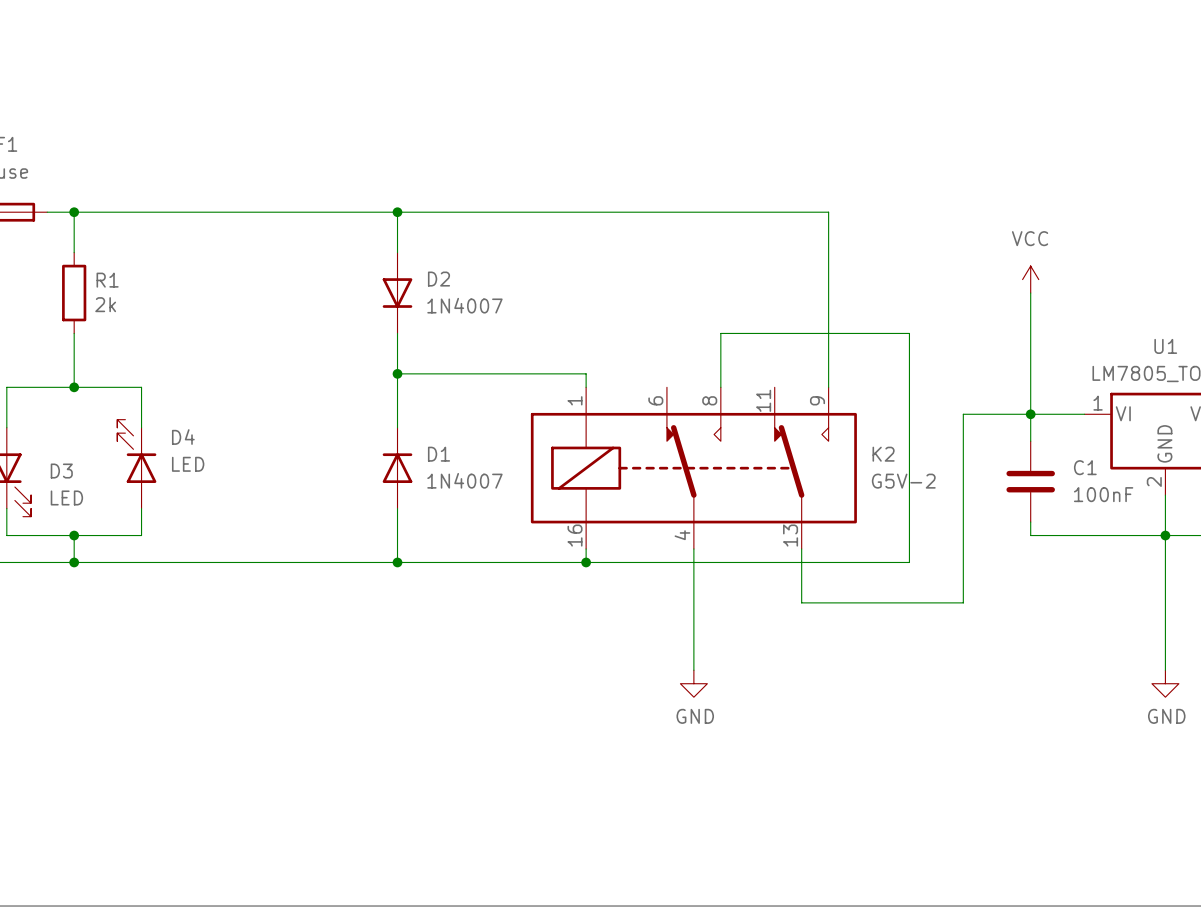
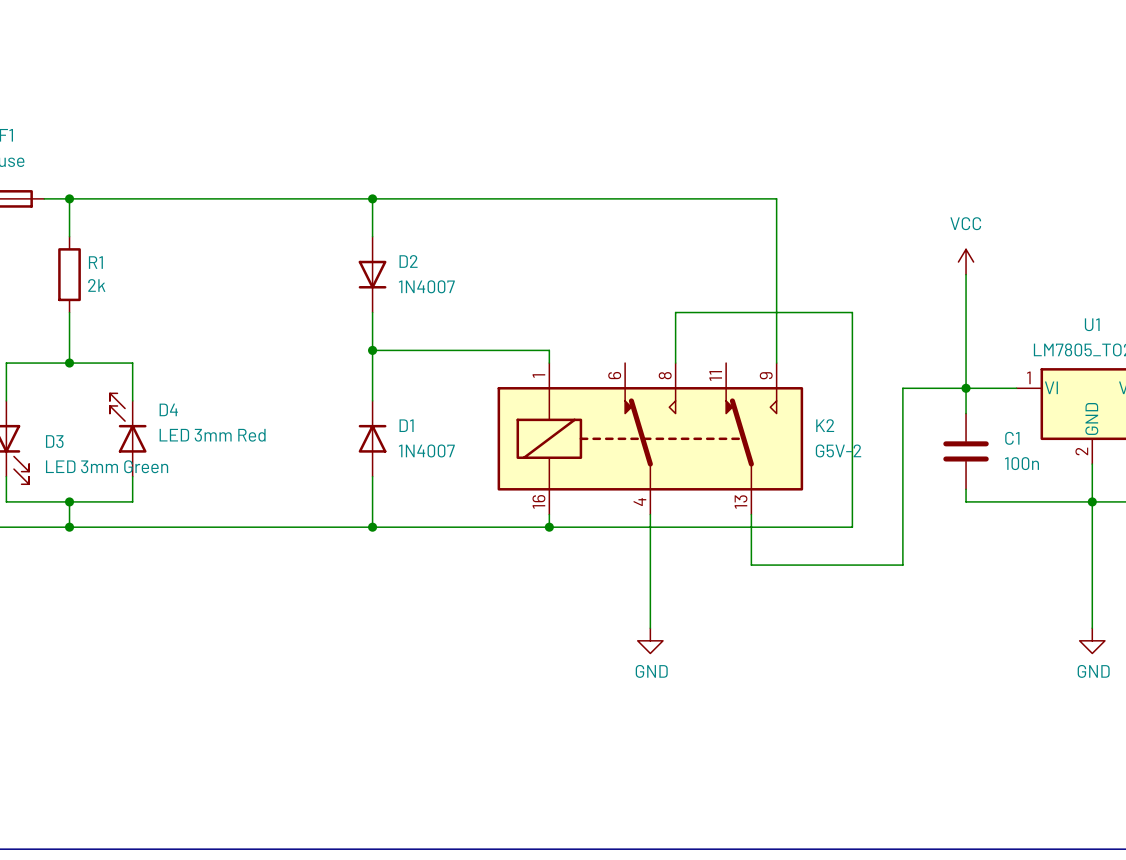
D4 value: LED (188, 464) -> LED 3mm Red (212, 435)
C1 value: 100nF (1103, 494) -> 100n (1021, 463)
D3 value: LED (66, 497) -> LED 3mm Green (107, 466)

